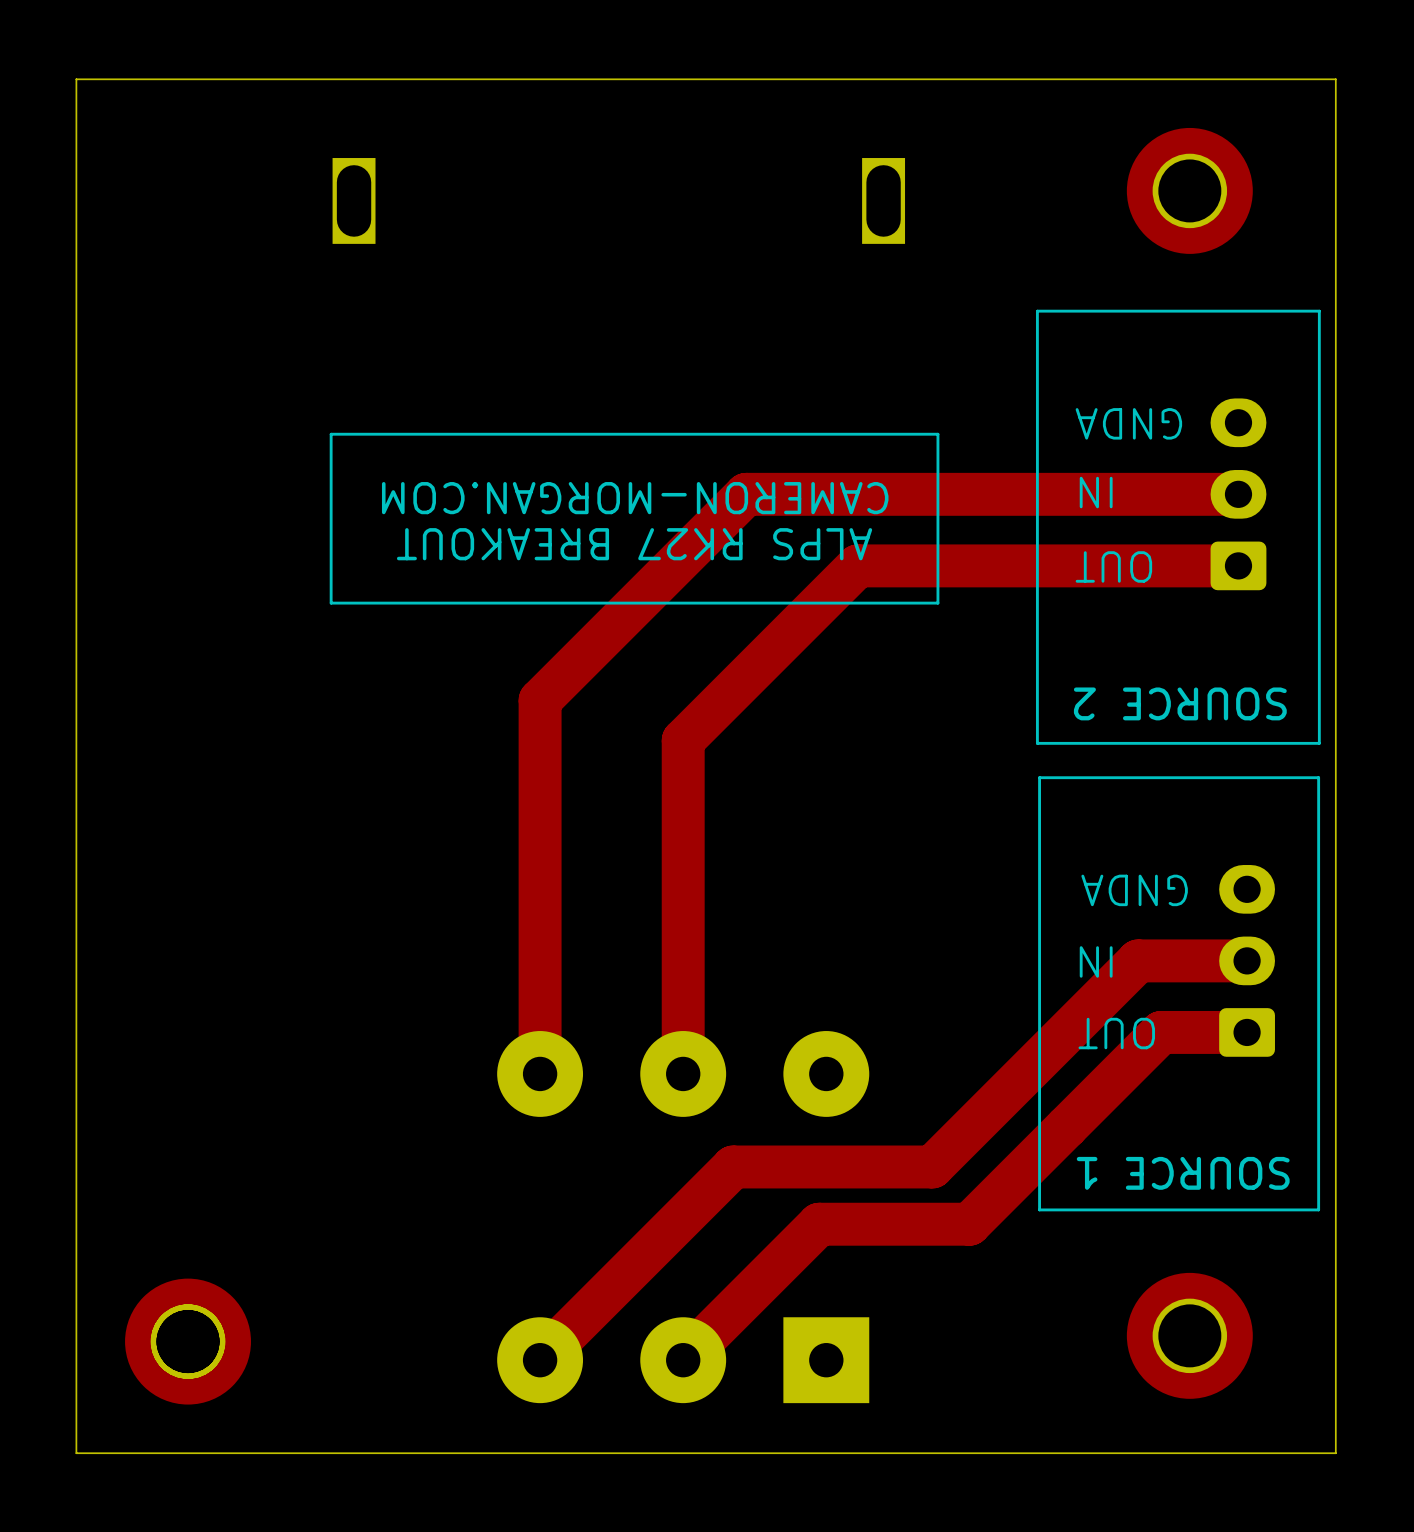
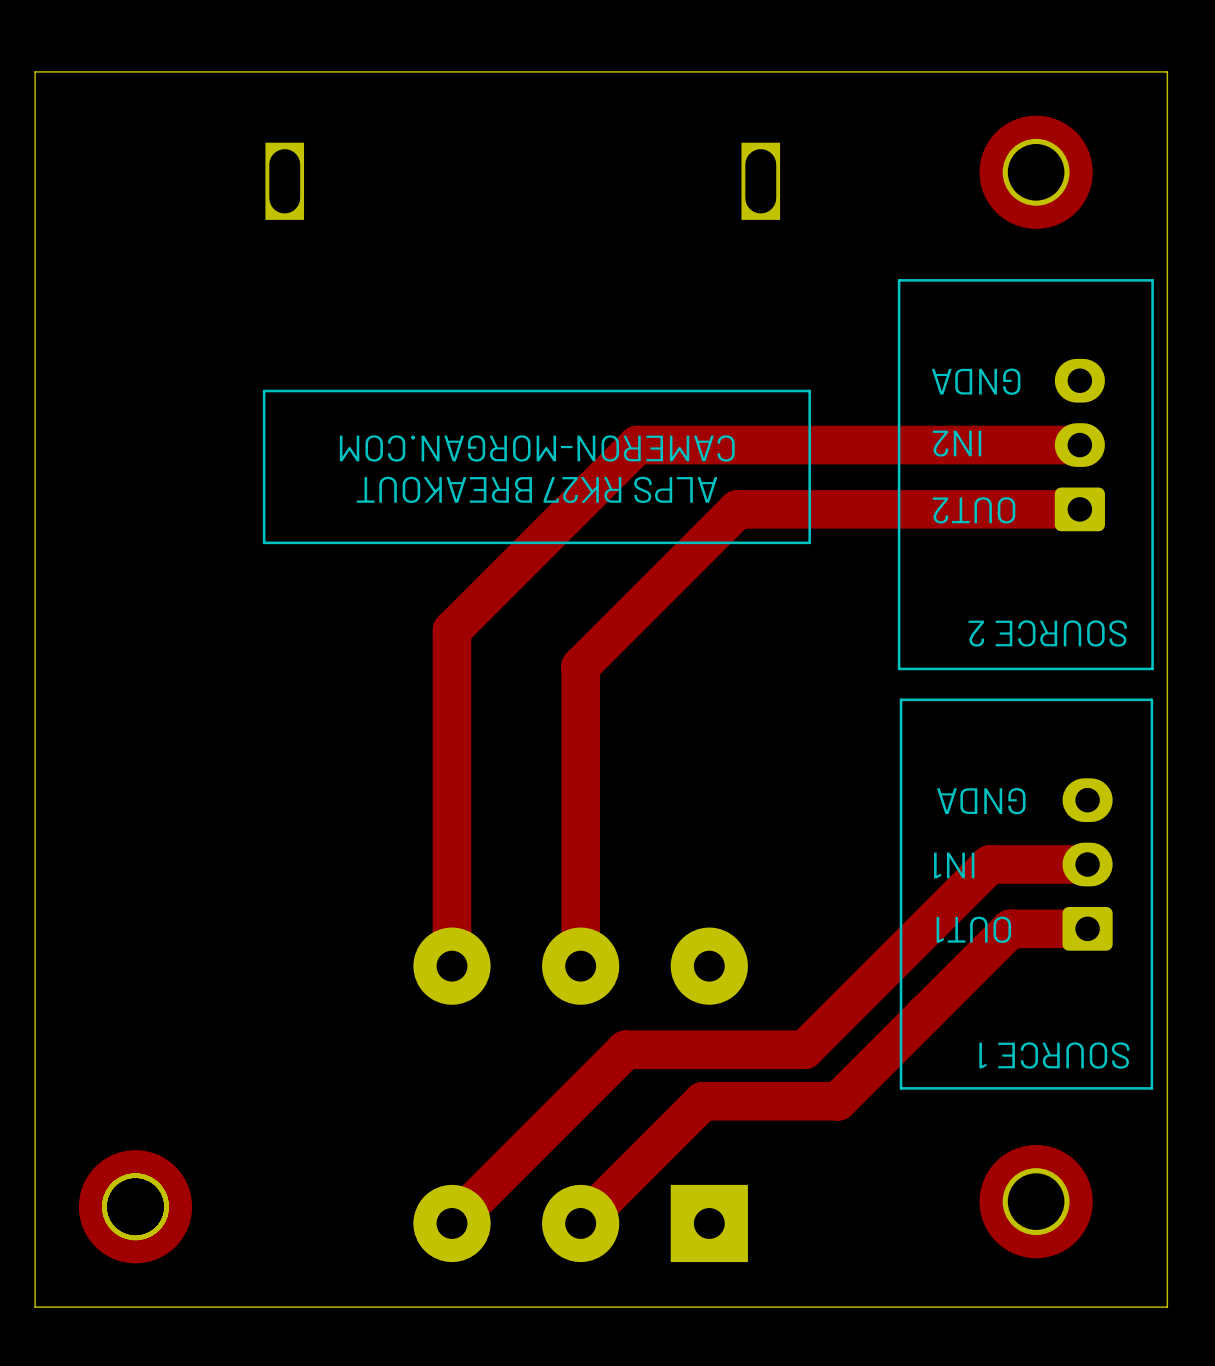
text: IN (1096, 492) -> IN2 (957, 443)
text: OUT (1113, 566) -> OUT2 (974, 510)
text: IN (1096, 961) -> IN1 (954, 865)
text: OUT (1116, 1033) -> OUT1 (973, 929)

